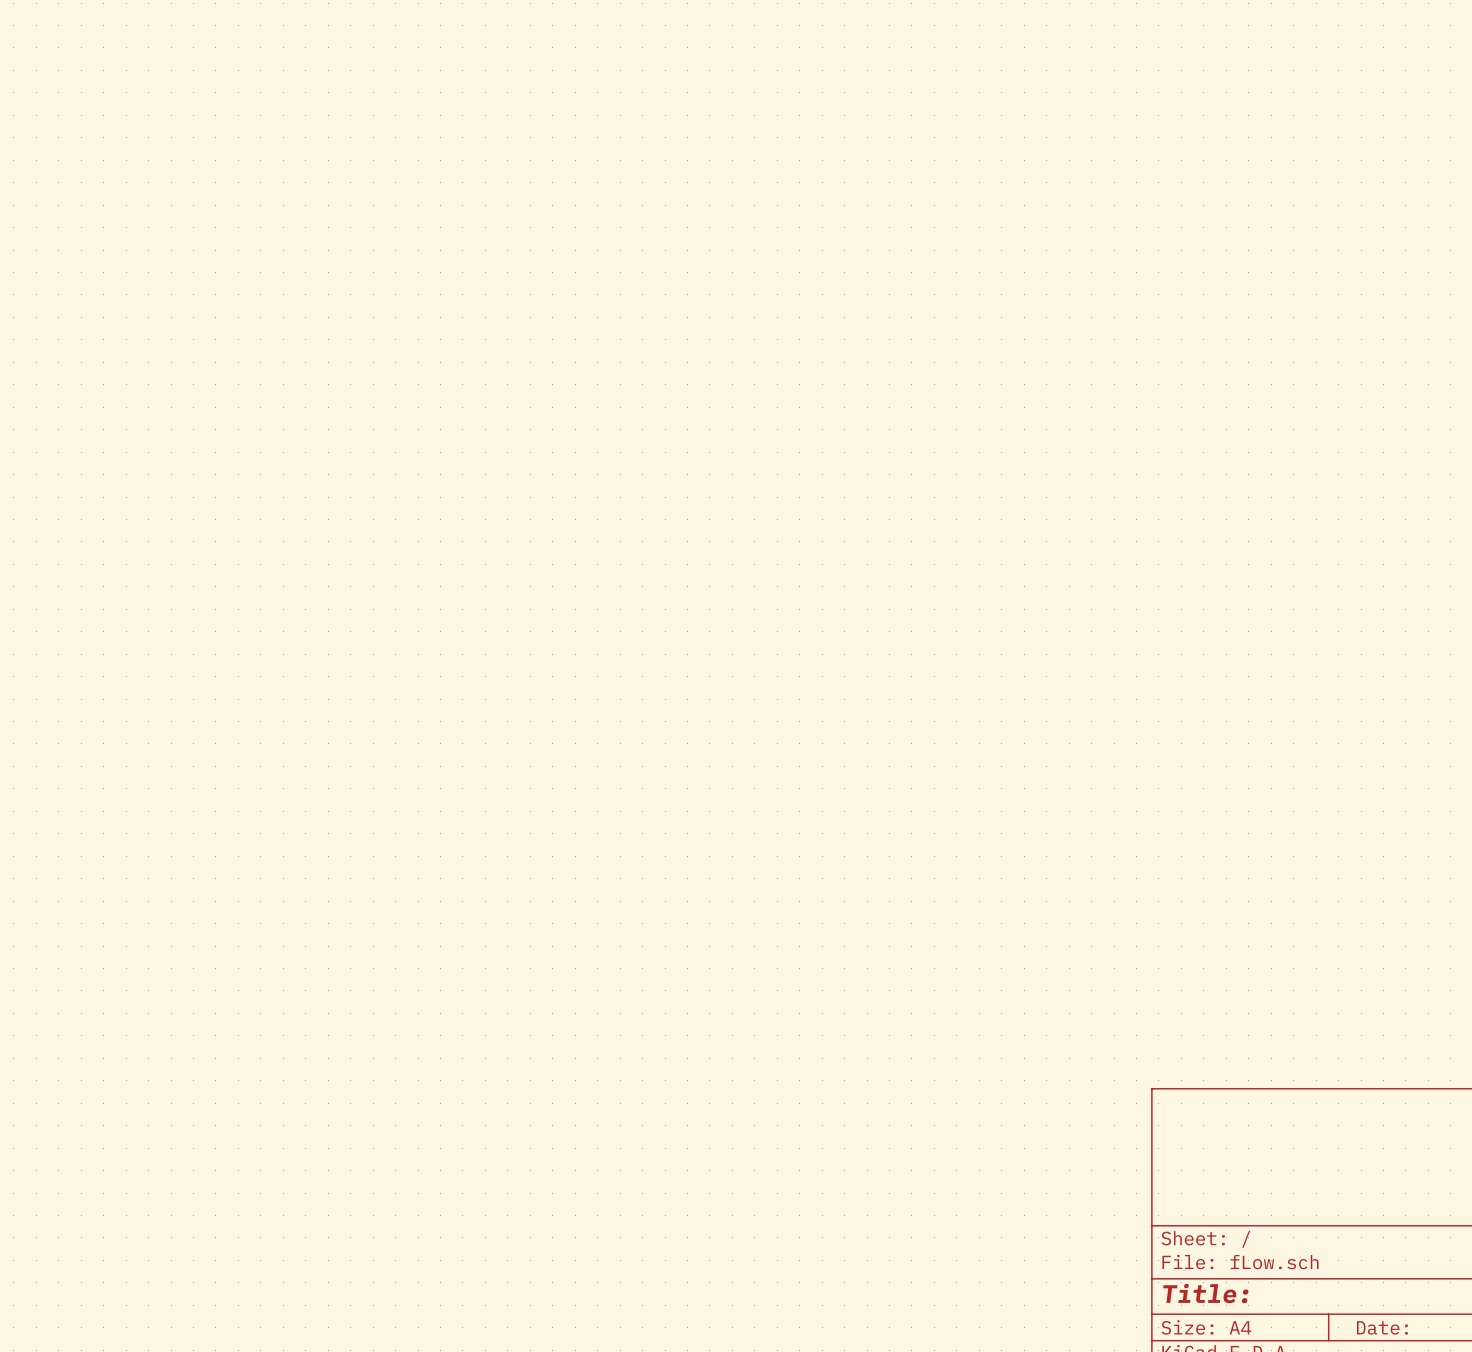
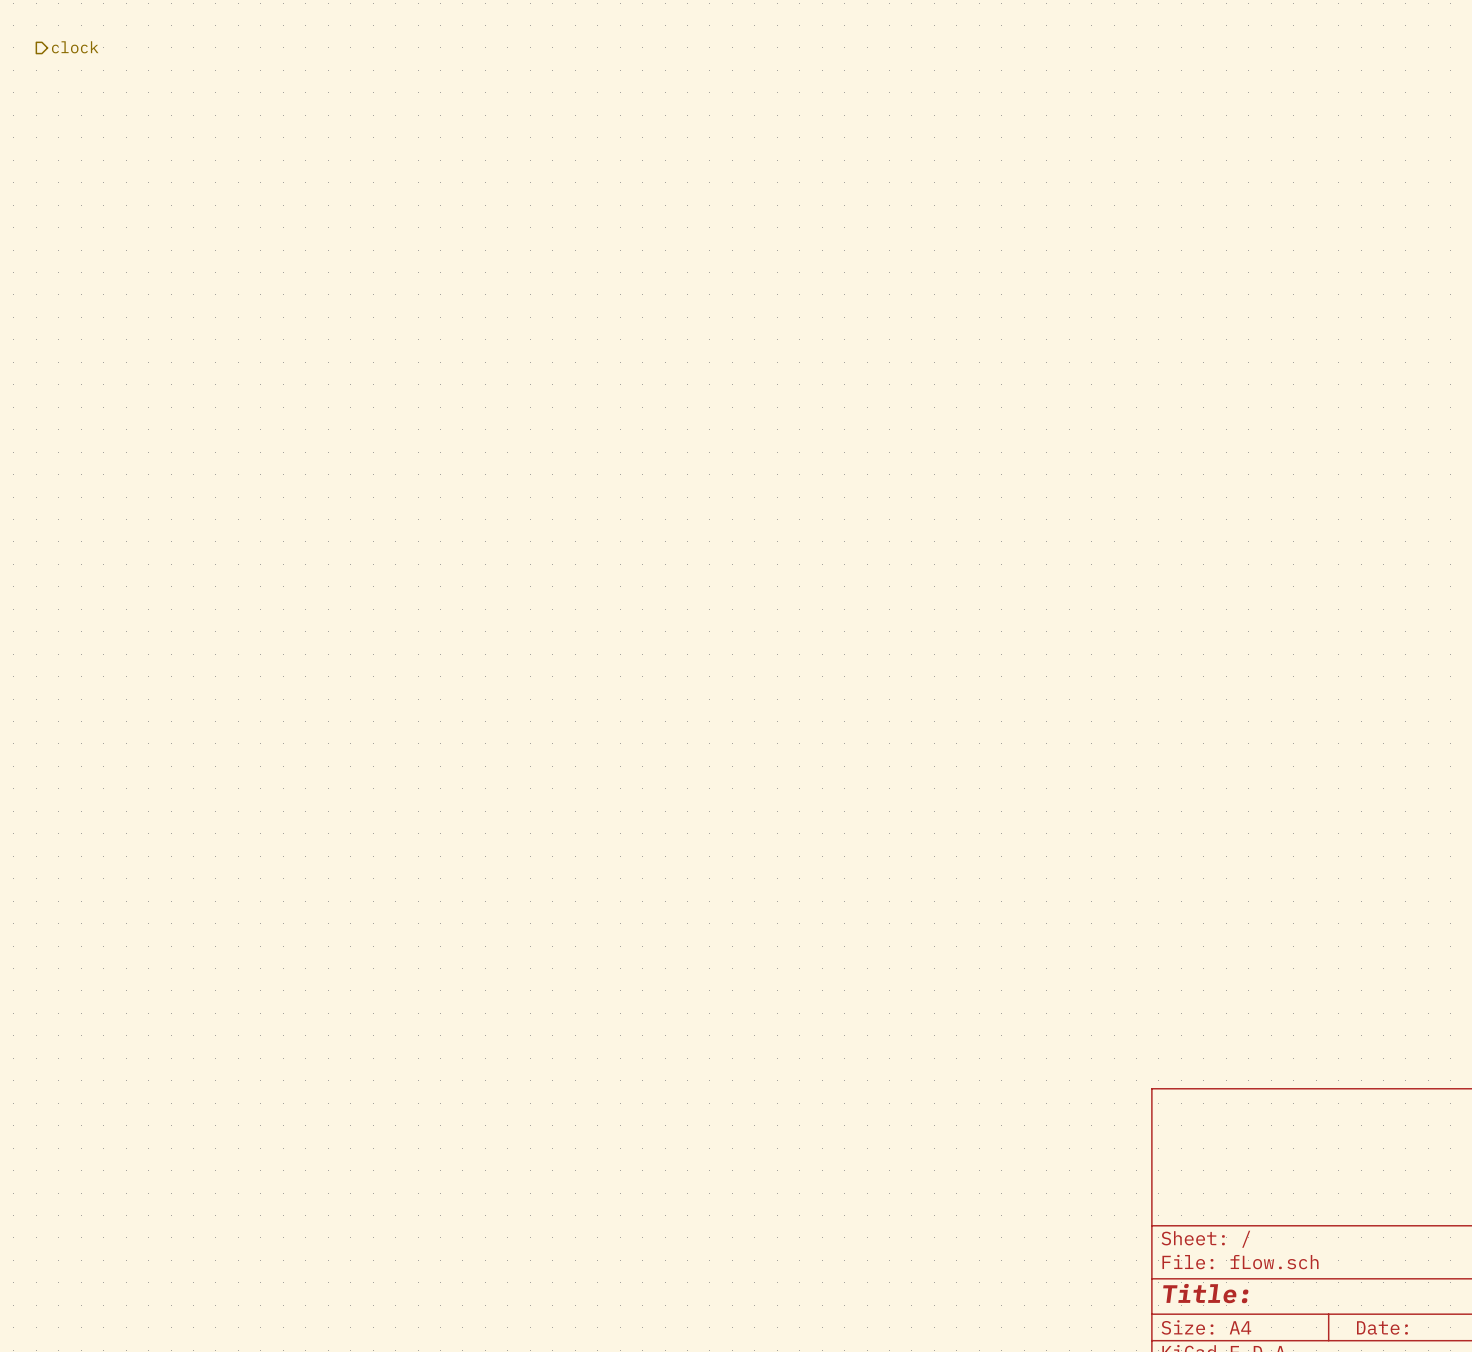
hierarchical label: none -> clock (75, 47)

